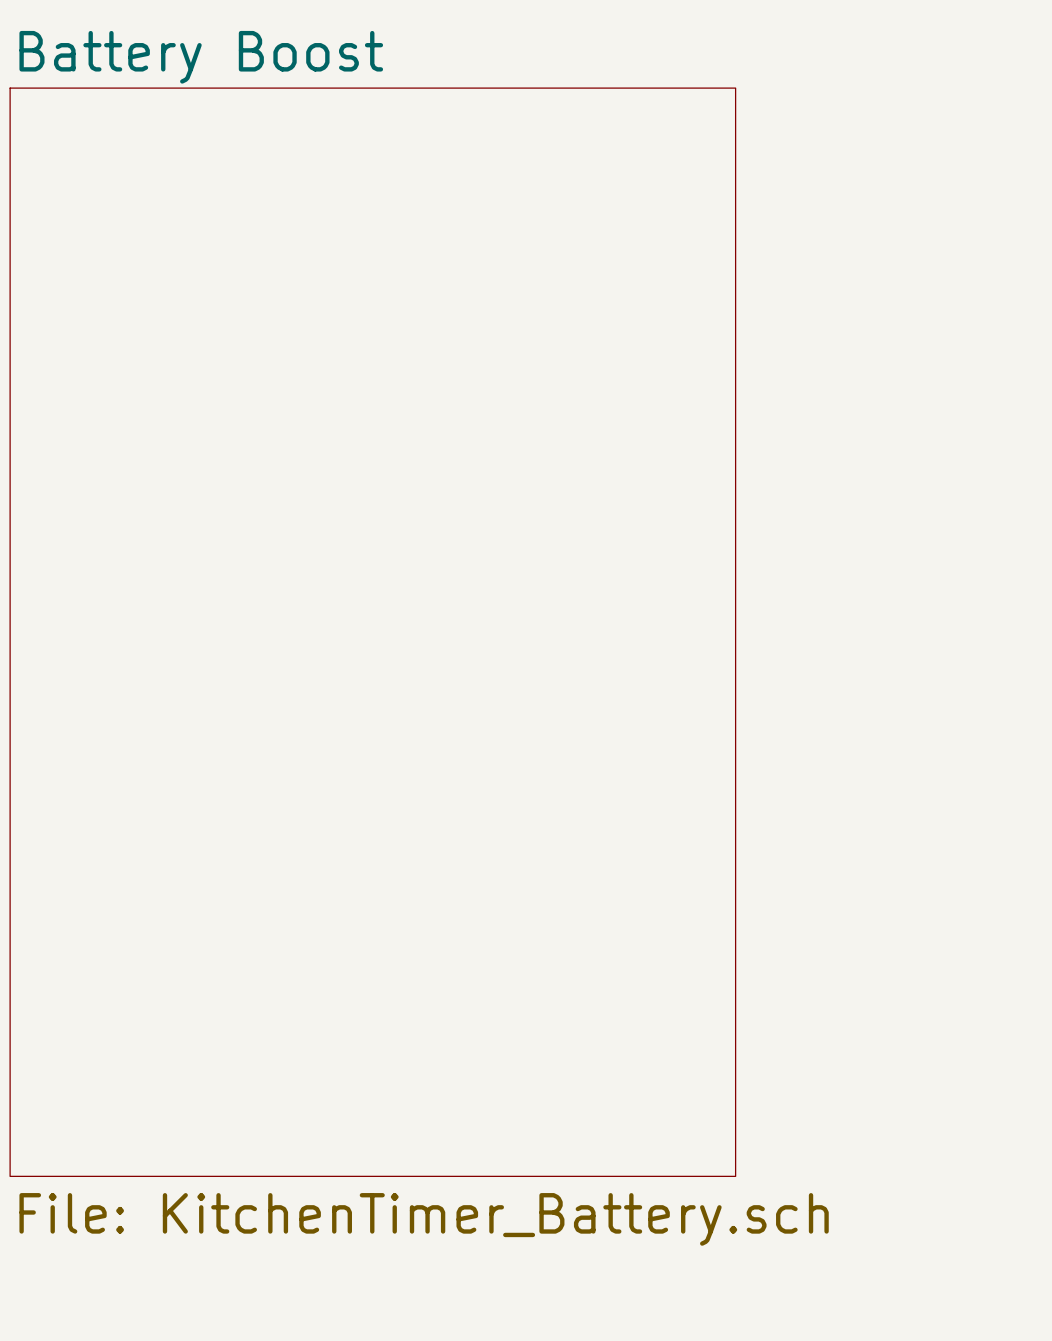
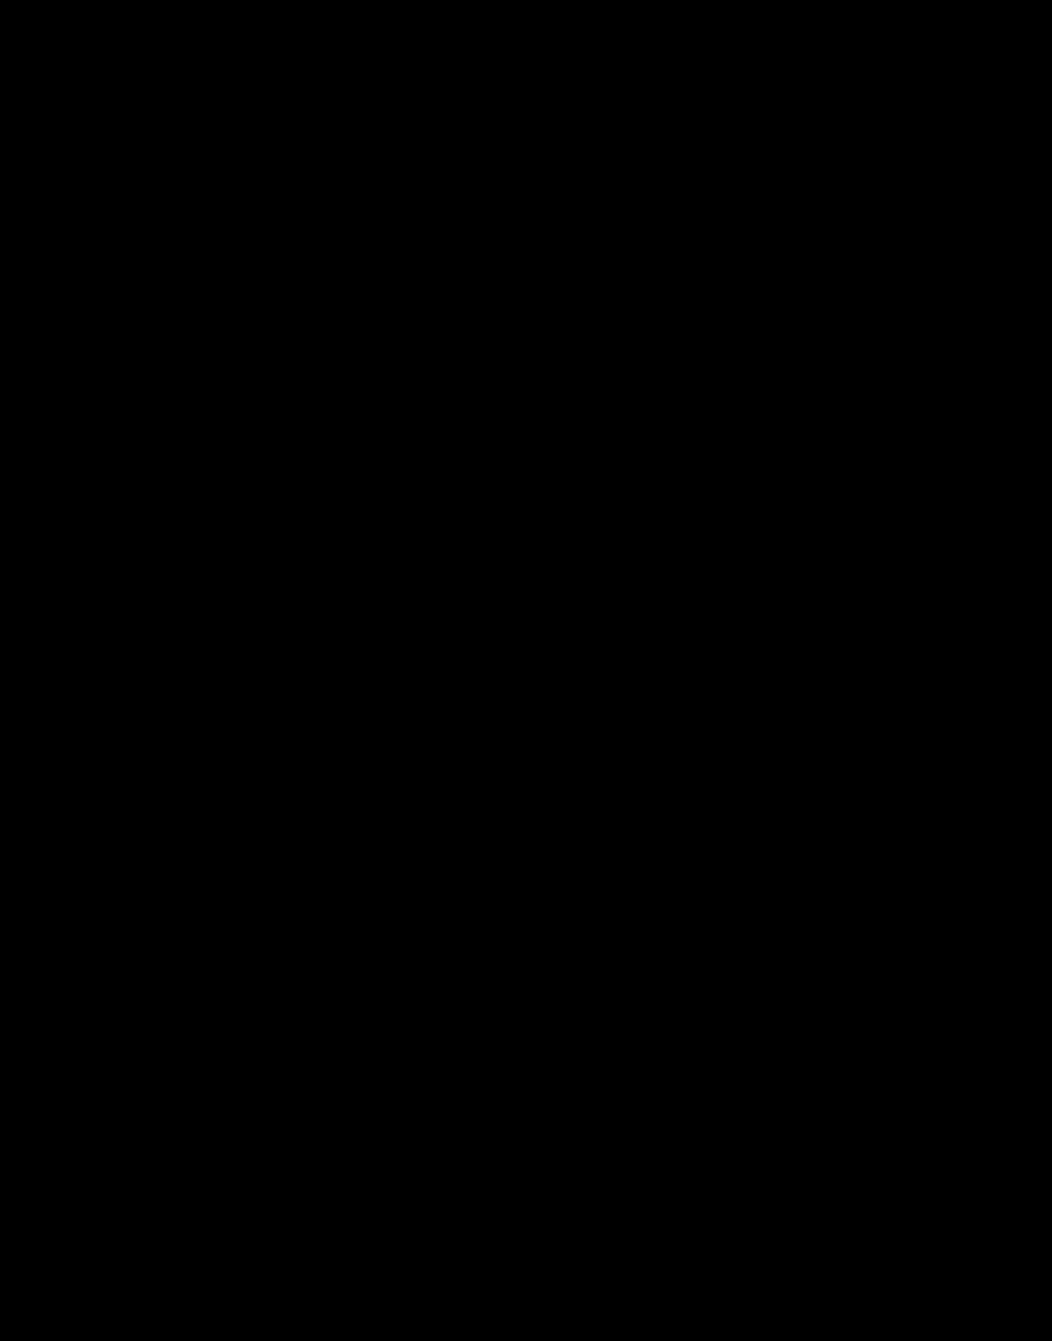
sheet Battery Boost: File: KitchenTimer_Battery.sch (372, 632) -> none

